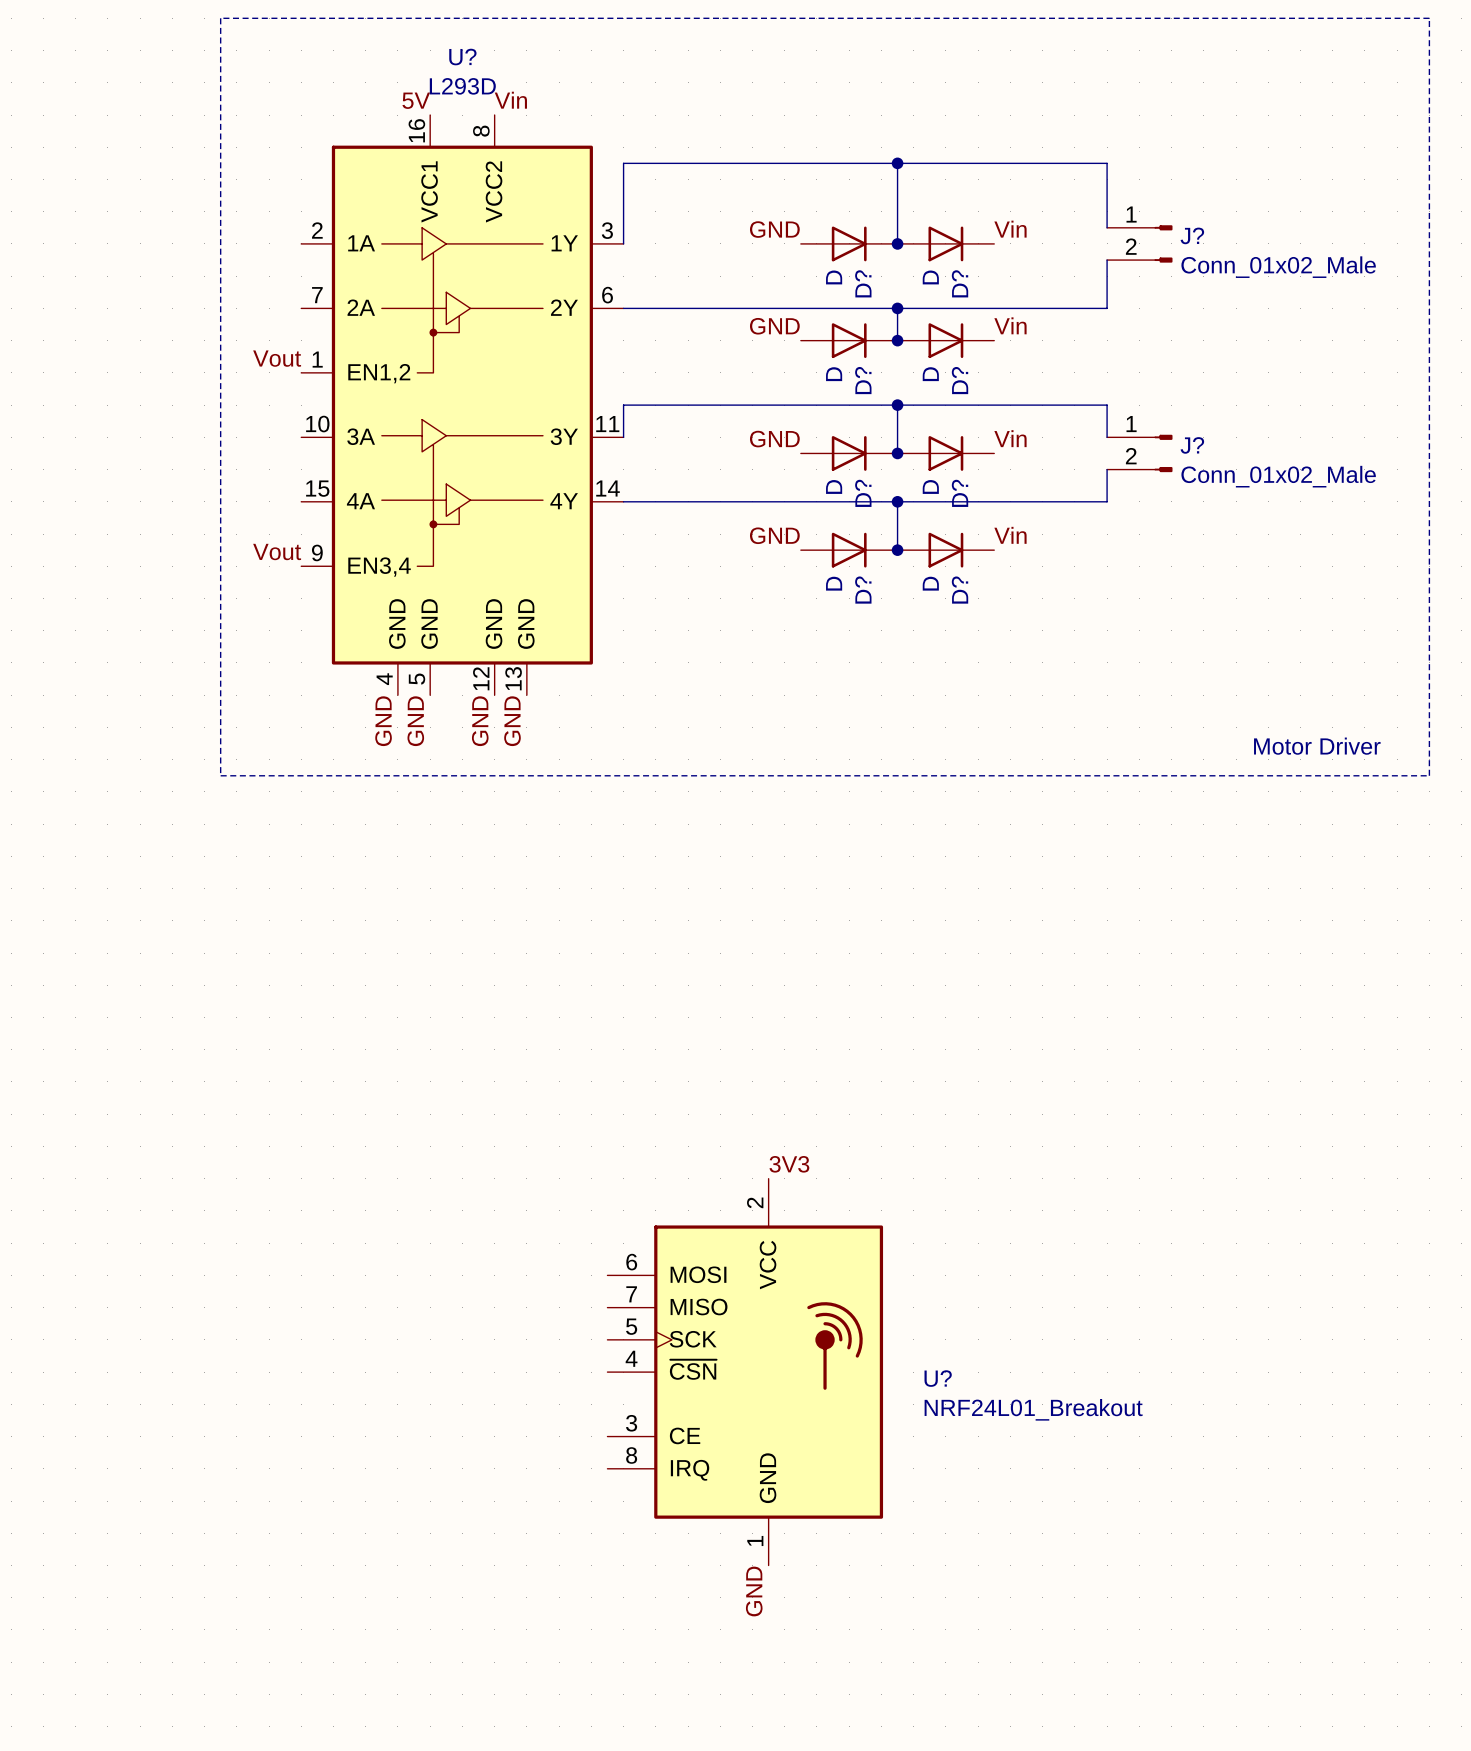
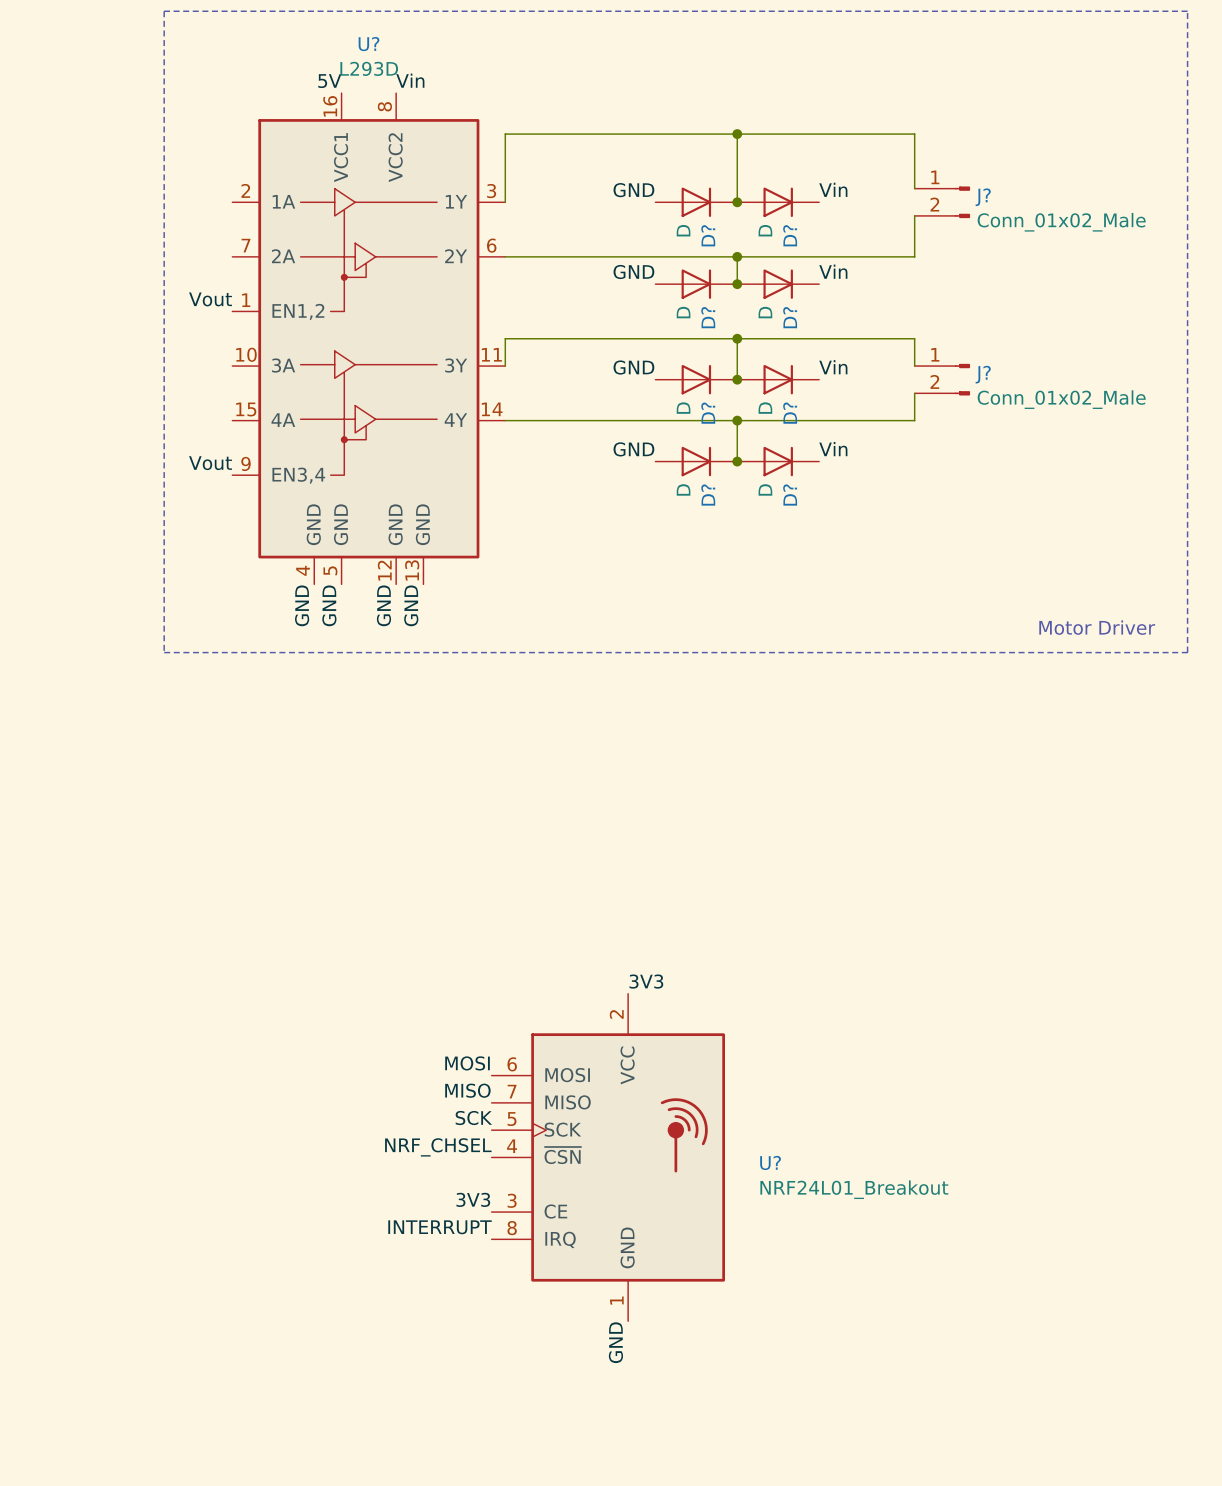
label: none -> MOSI (467, 1063)
label: none -> MISO (467, 1090)
label: none -> SCK (473, 1118)
label: none -> NRF_CHSEL (438, 1147)
label: none -> 3V3 (473, 1199)
label: none -> INTERRUPT (440, 1227)

